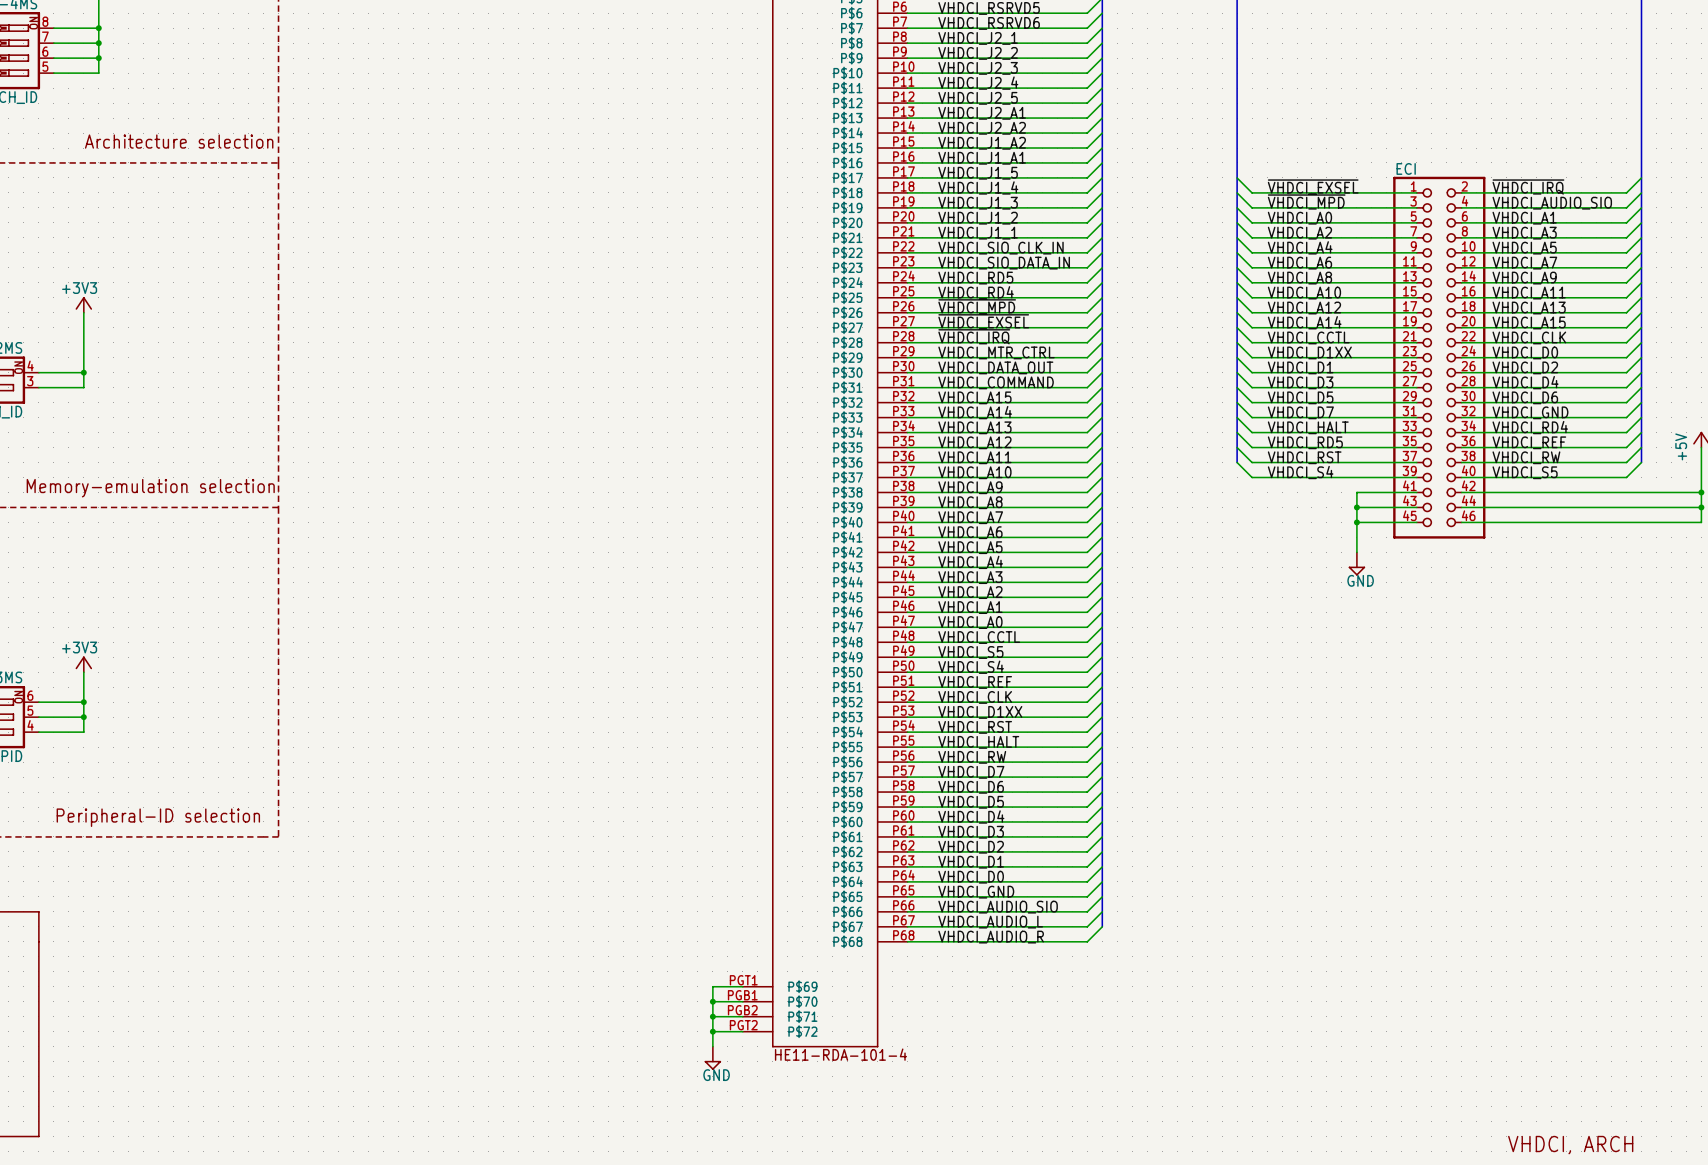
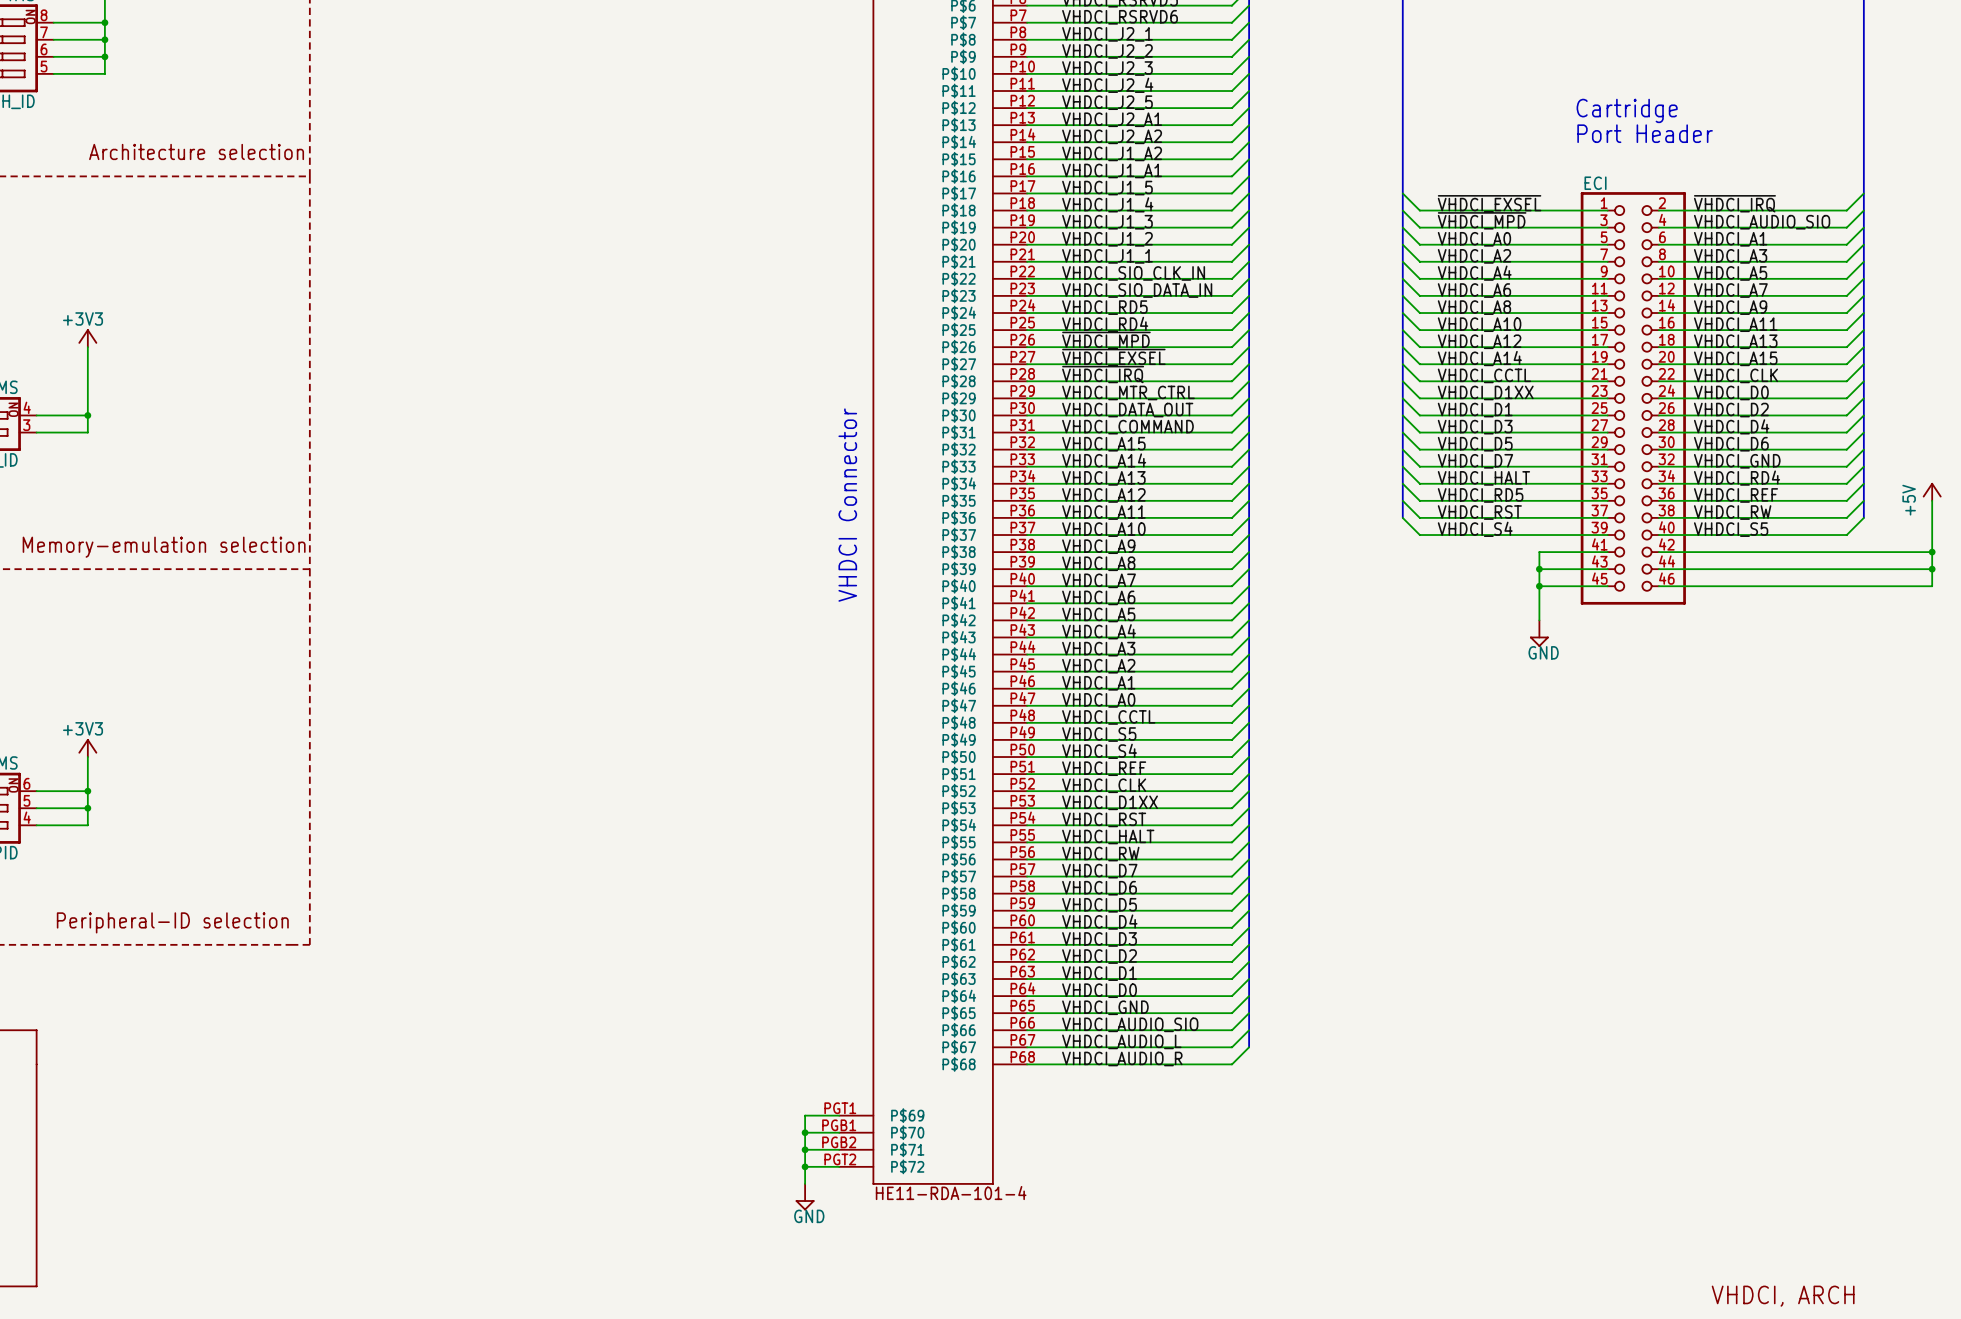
text: none -> Cartridge (1627, 110)
text: none -> Port Header (1645, 133)
text: none -> VHDCI Connector (847, 505)

